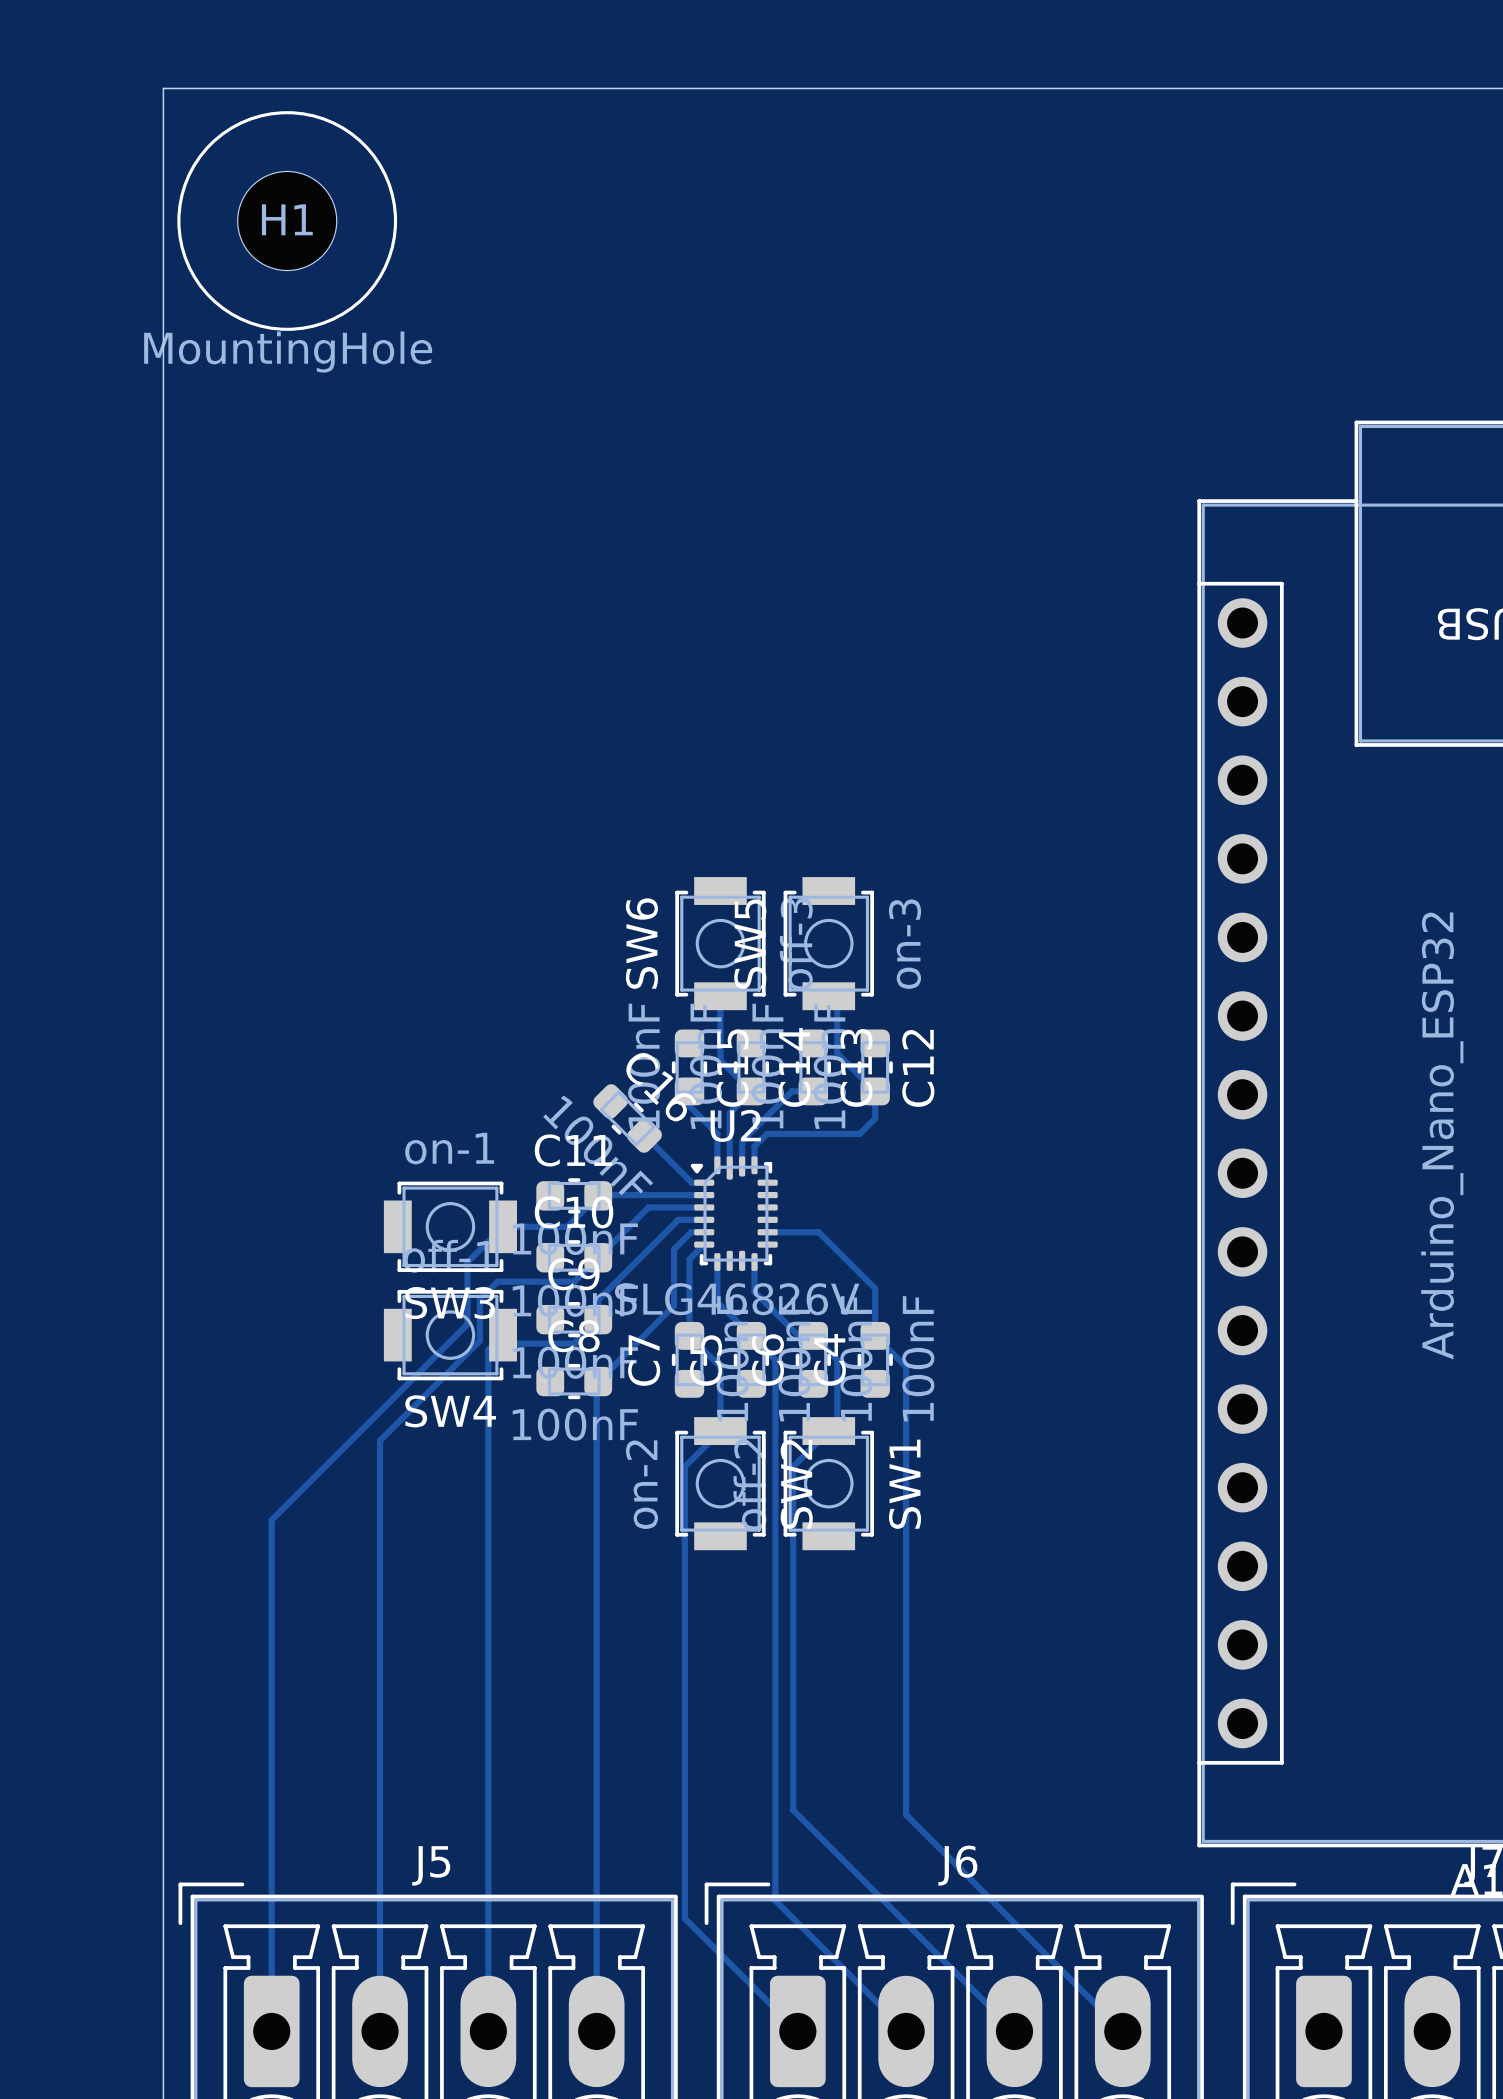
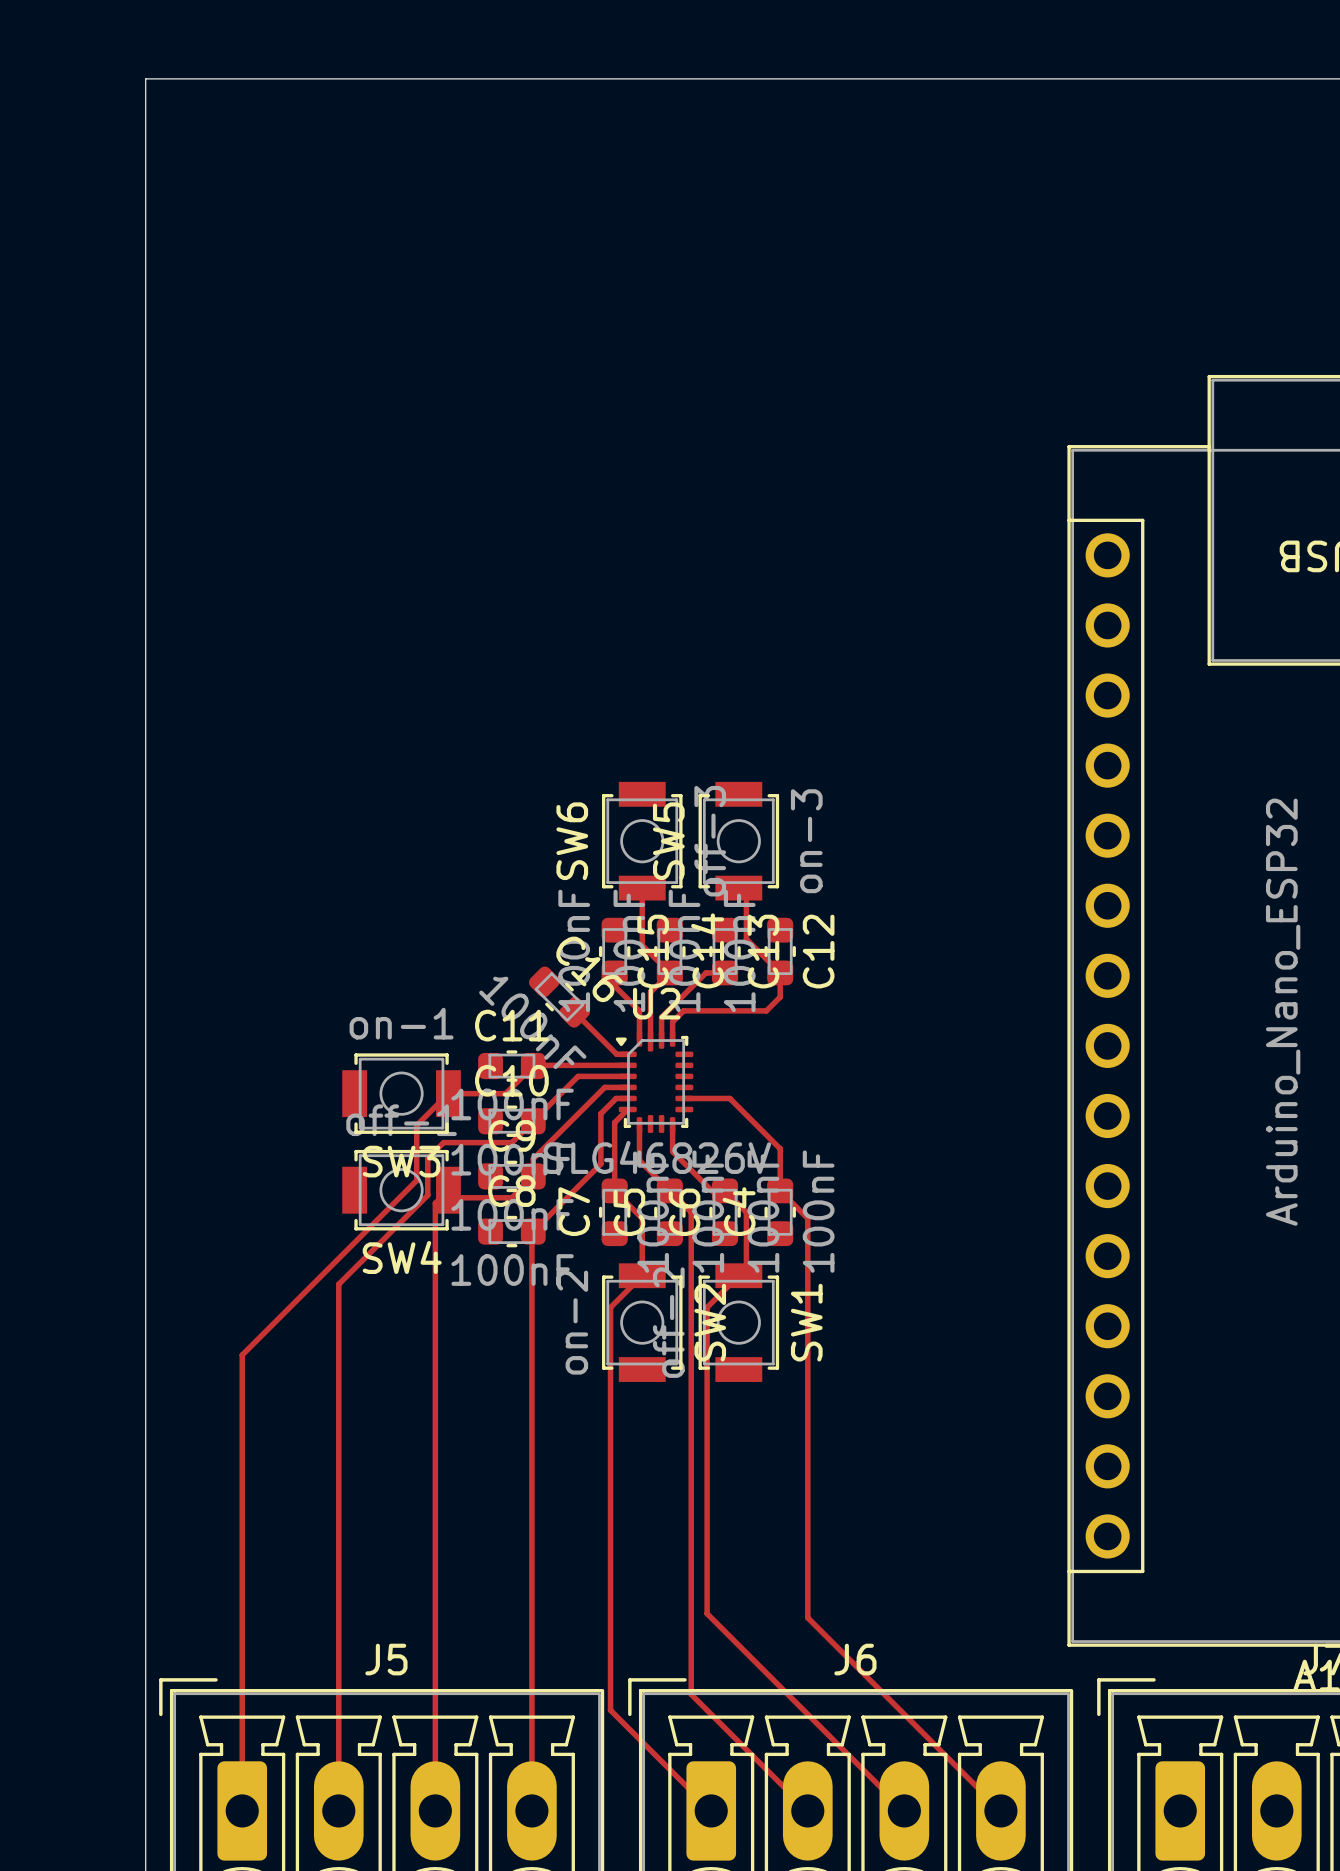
drawing: [177, 111, 398, 331] -> none
H1: MountingHole (287, 221) -> none

